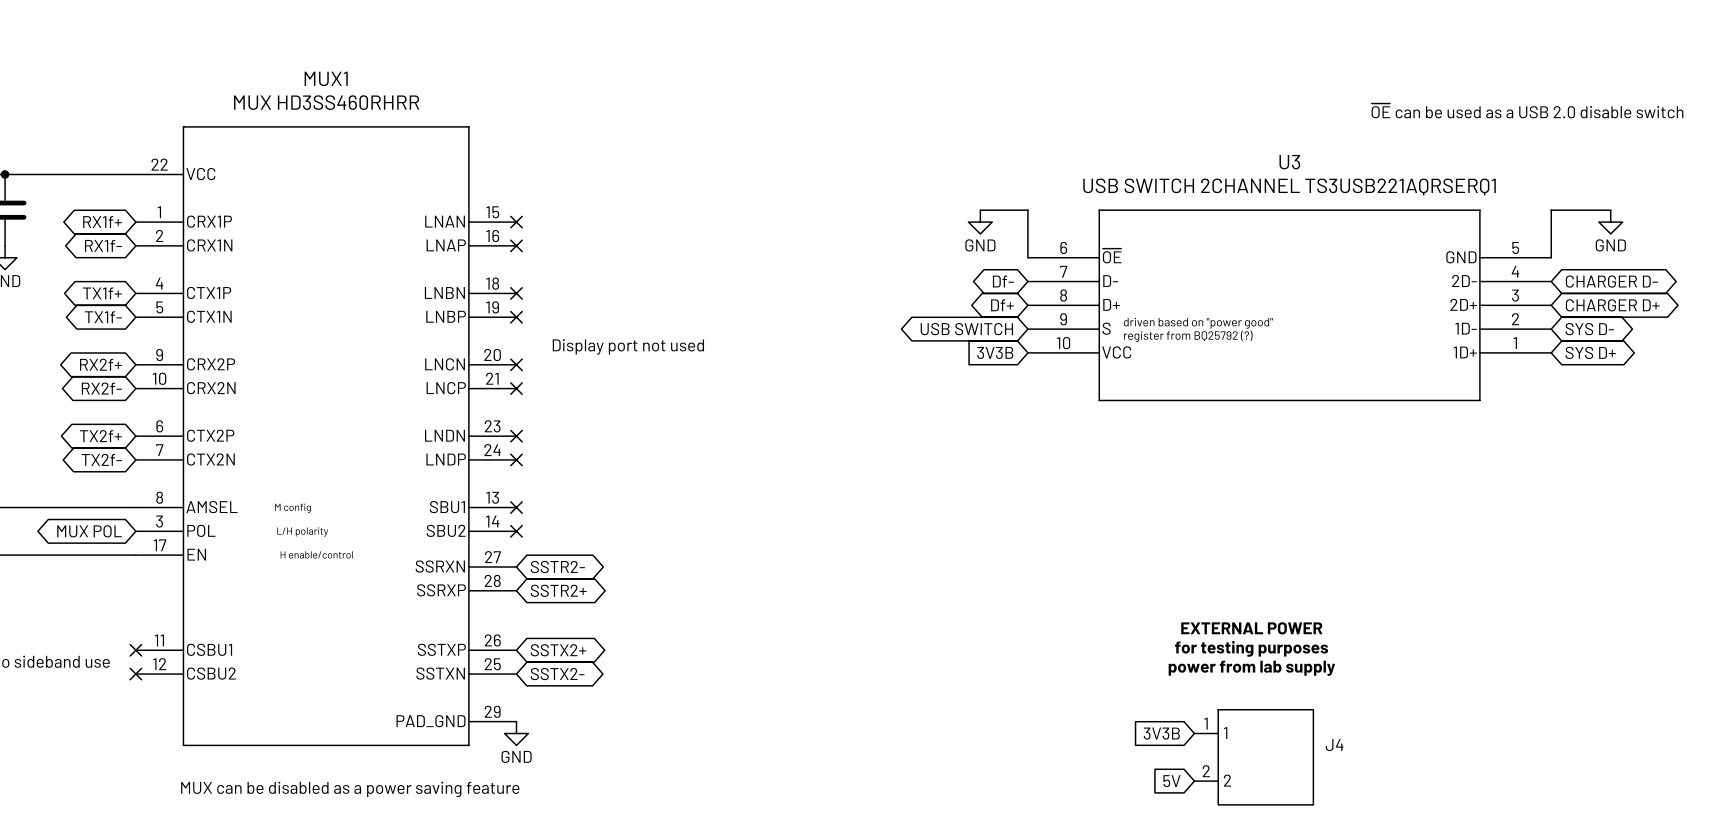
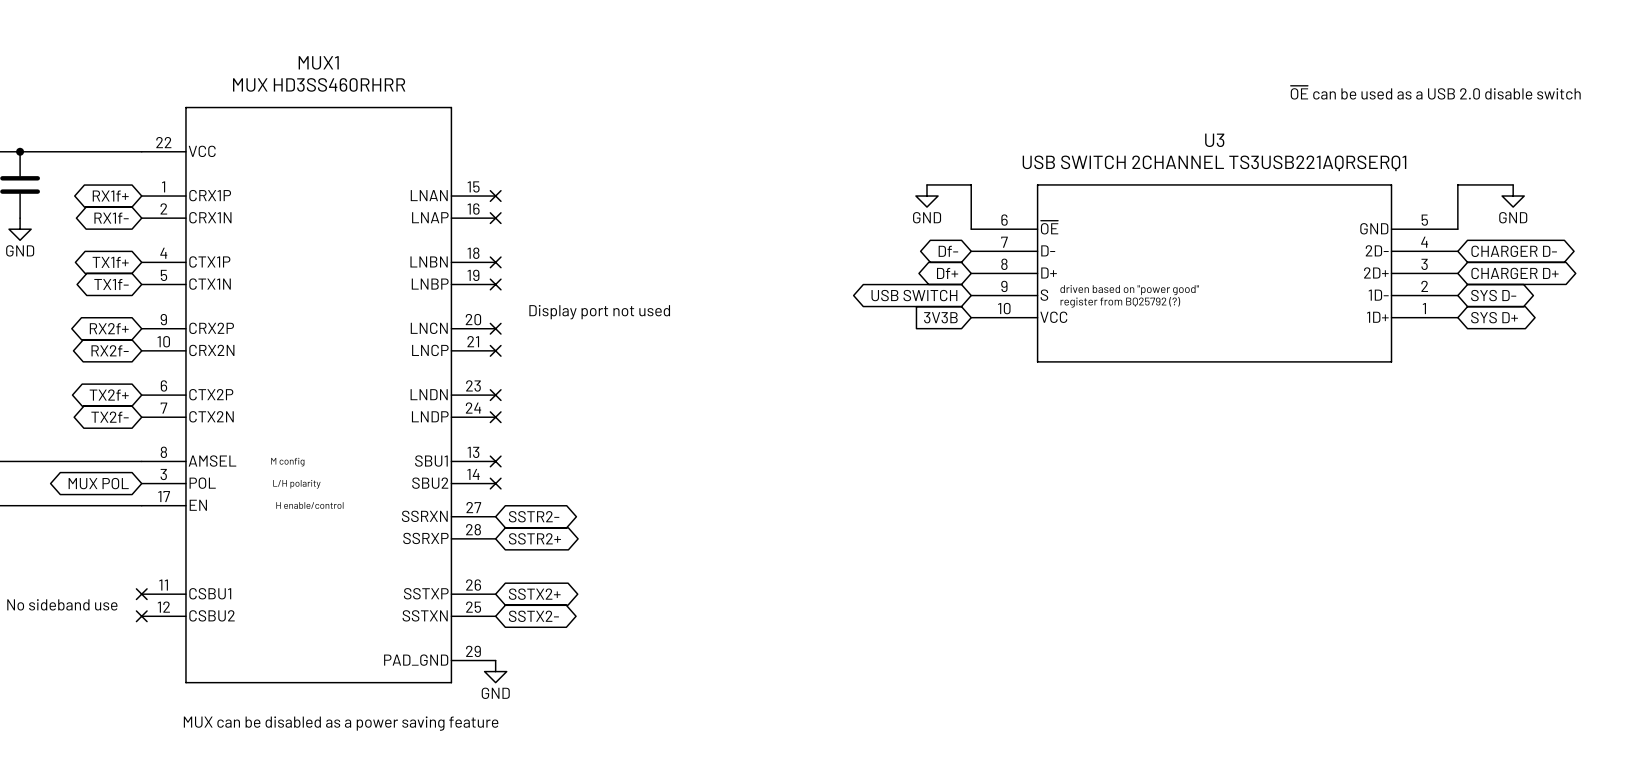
text: EXTERNAL POWER (1251, 628) -> none
text: for testing purposes (1251, 648) -> none
text: power from lab supply (1251, 668) -> none
global label: 3V3B (1161, 733) -> none
J4: (1253, 757) -> none
global label: 5V (1171, 781) -> none

